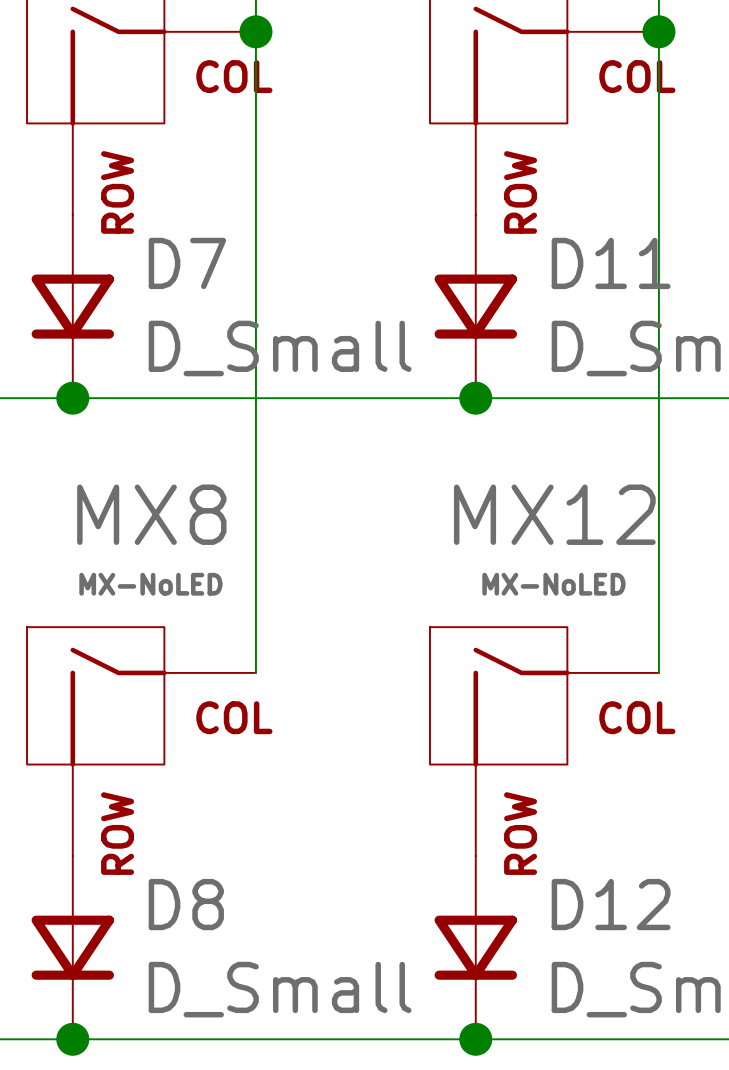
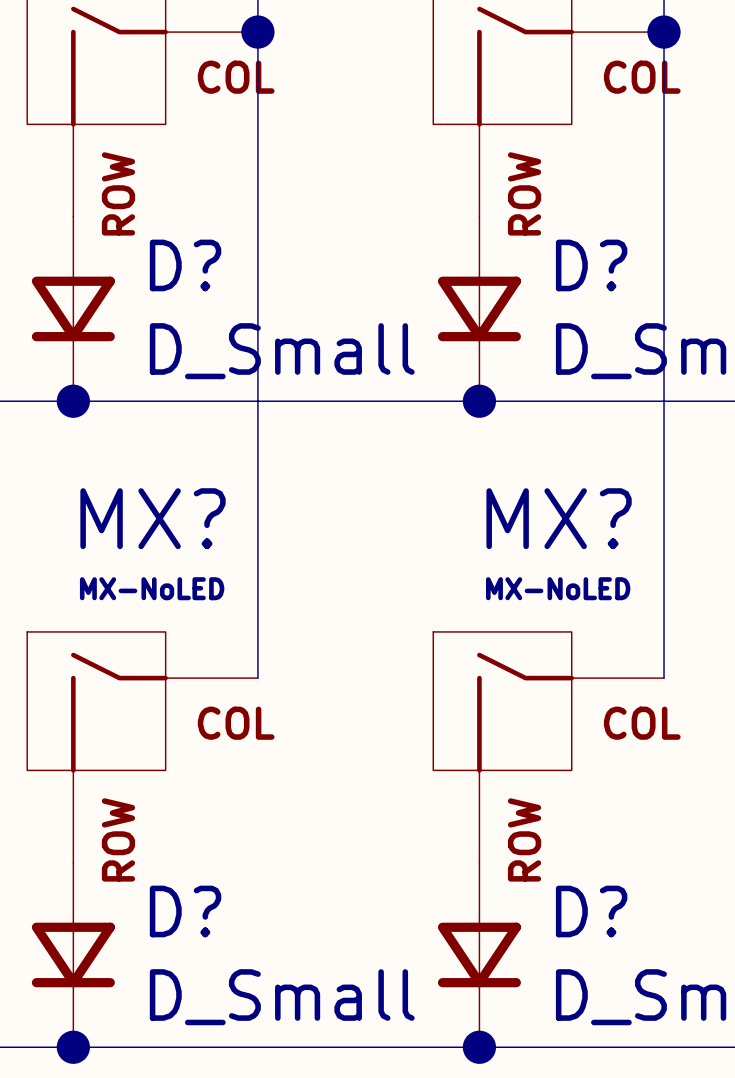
D7 name: D7 (187, 263) -> D? (185, 265)
D11 name: D11 (611, 263) -> D? (591, 265)
MX8 name: MX8 (151, 514) -> MX? (152, 518)
MX12 name: MX12 (554, 514) -> MX? (559, 518)
D8 name: D8 (186, 904) -> D? (185, 911)
D12 name: D12 (611, 904) -> D? (591, 911)

